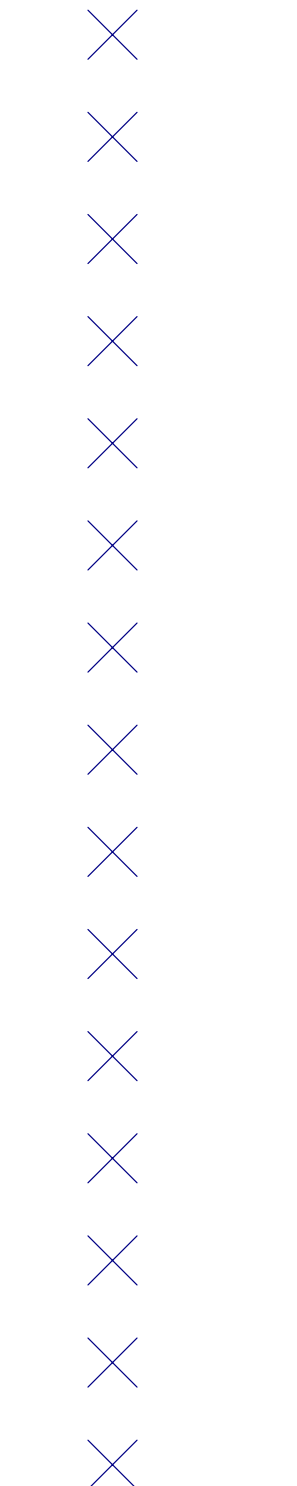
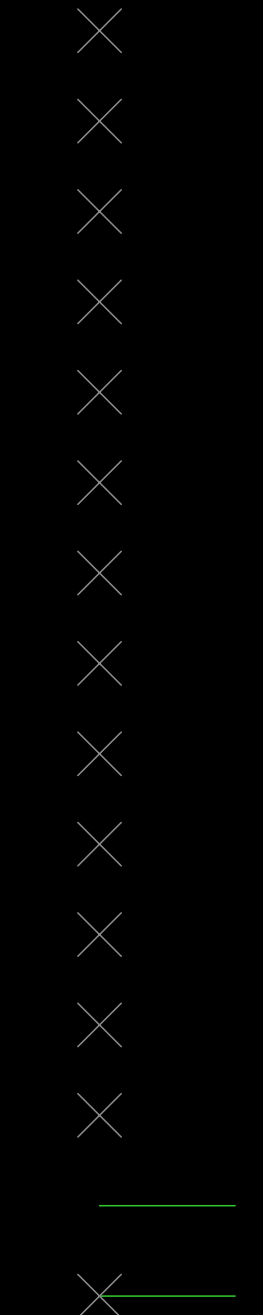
wire: none -> (99, 1205) (235, 1205)
no-connect mark: (112, 1362) -> none
wire: none -> (99, 1296) (235, 1296)

